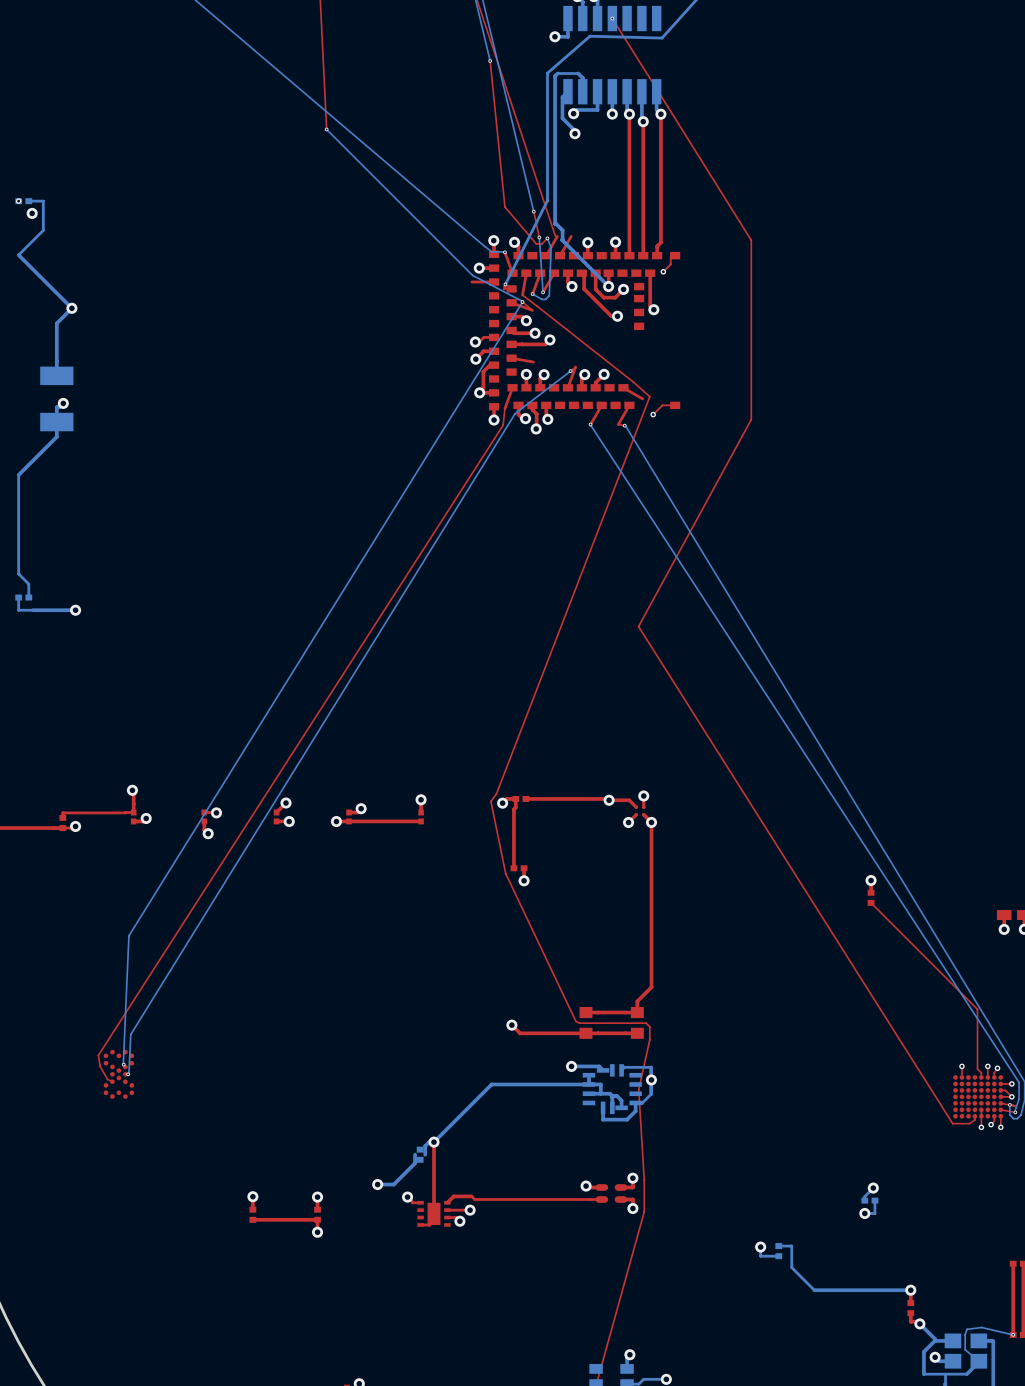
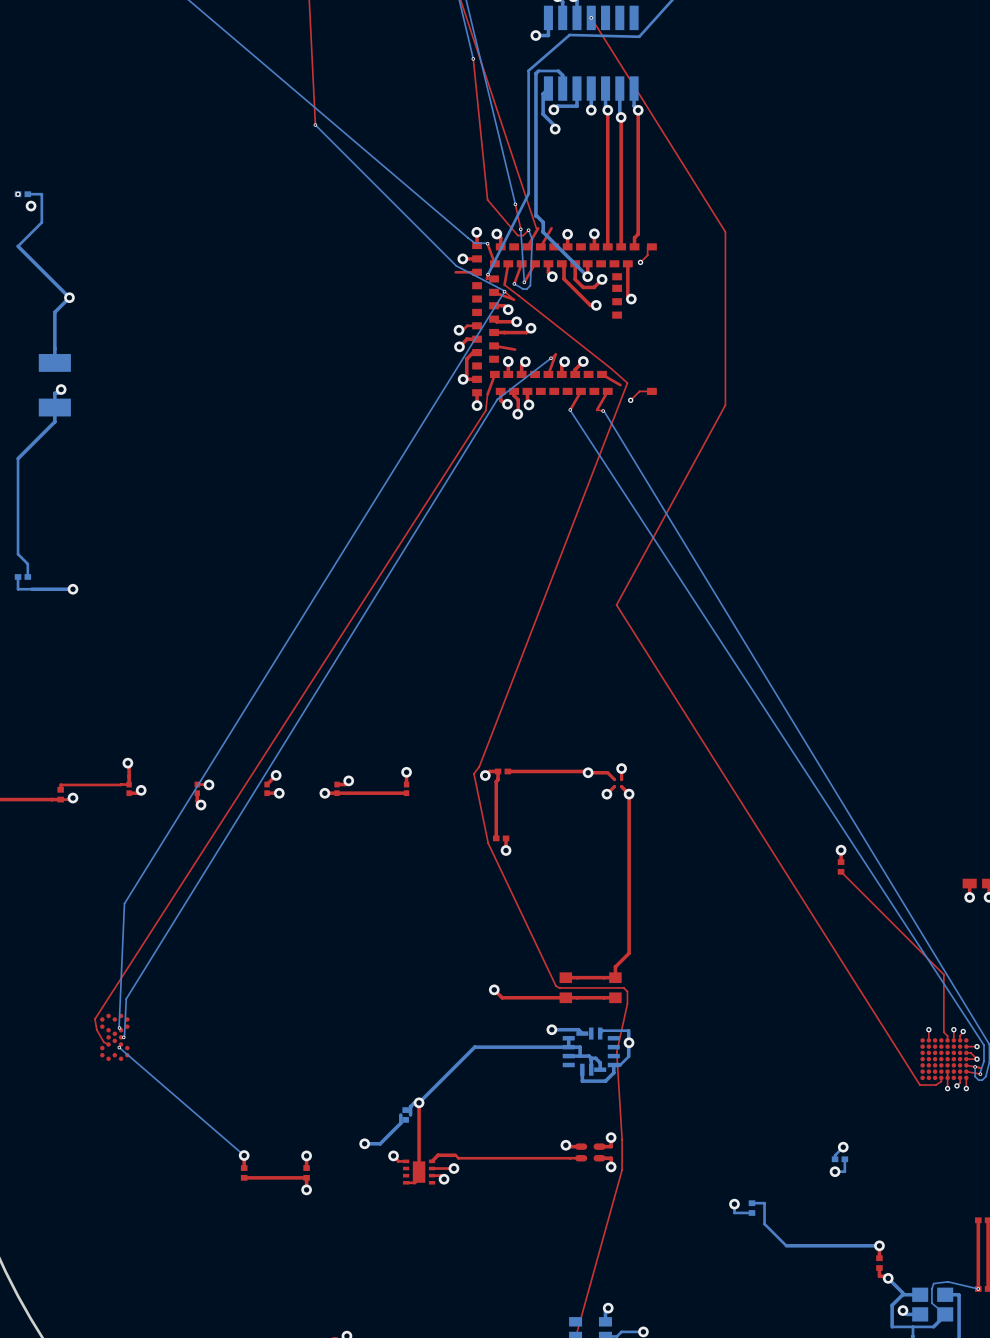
bottom track: none -> (119, 1047) (244, 1155)
via: none -> (119, 1047)

